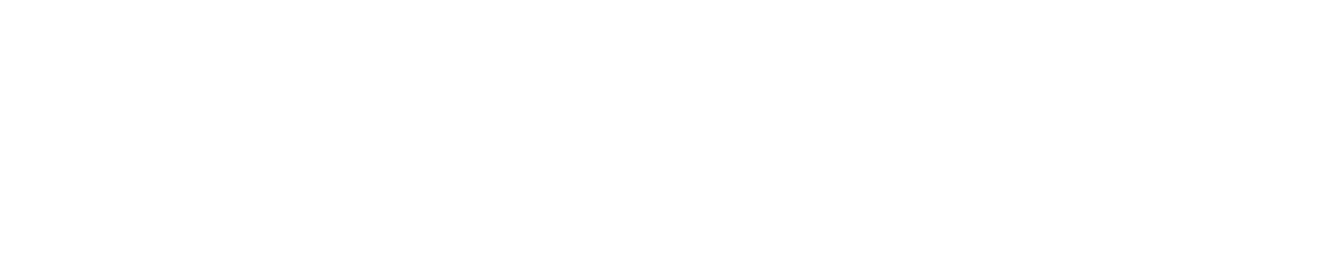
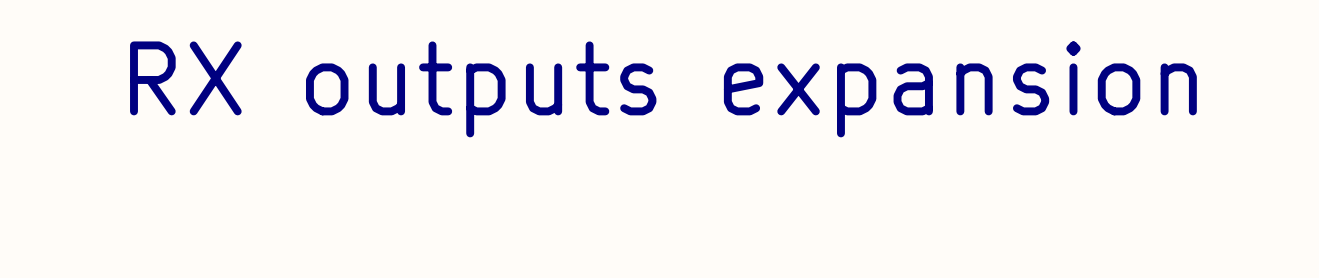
text: none -> RX outputs expansion (663, 89)

